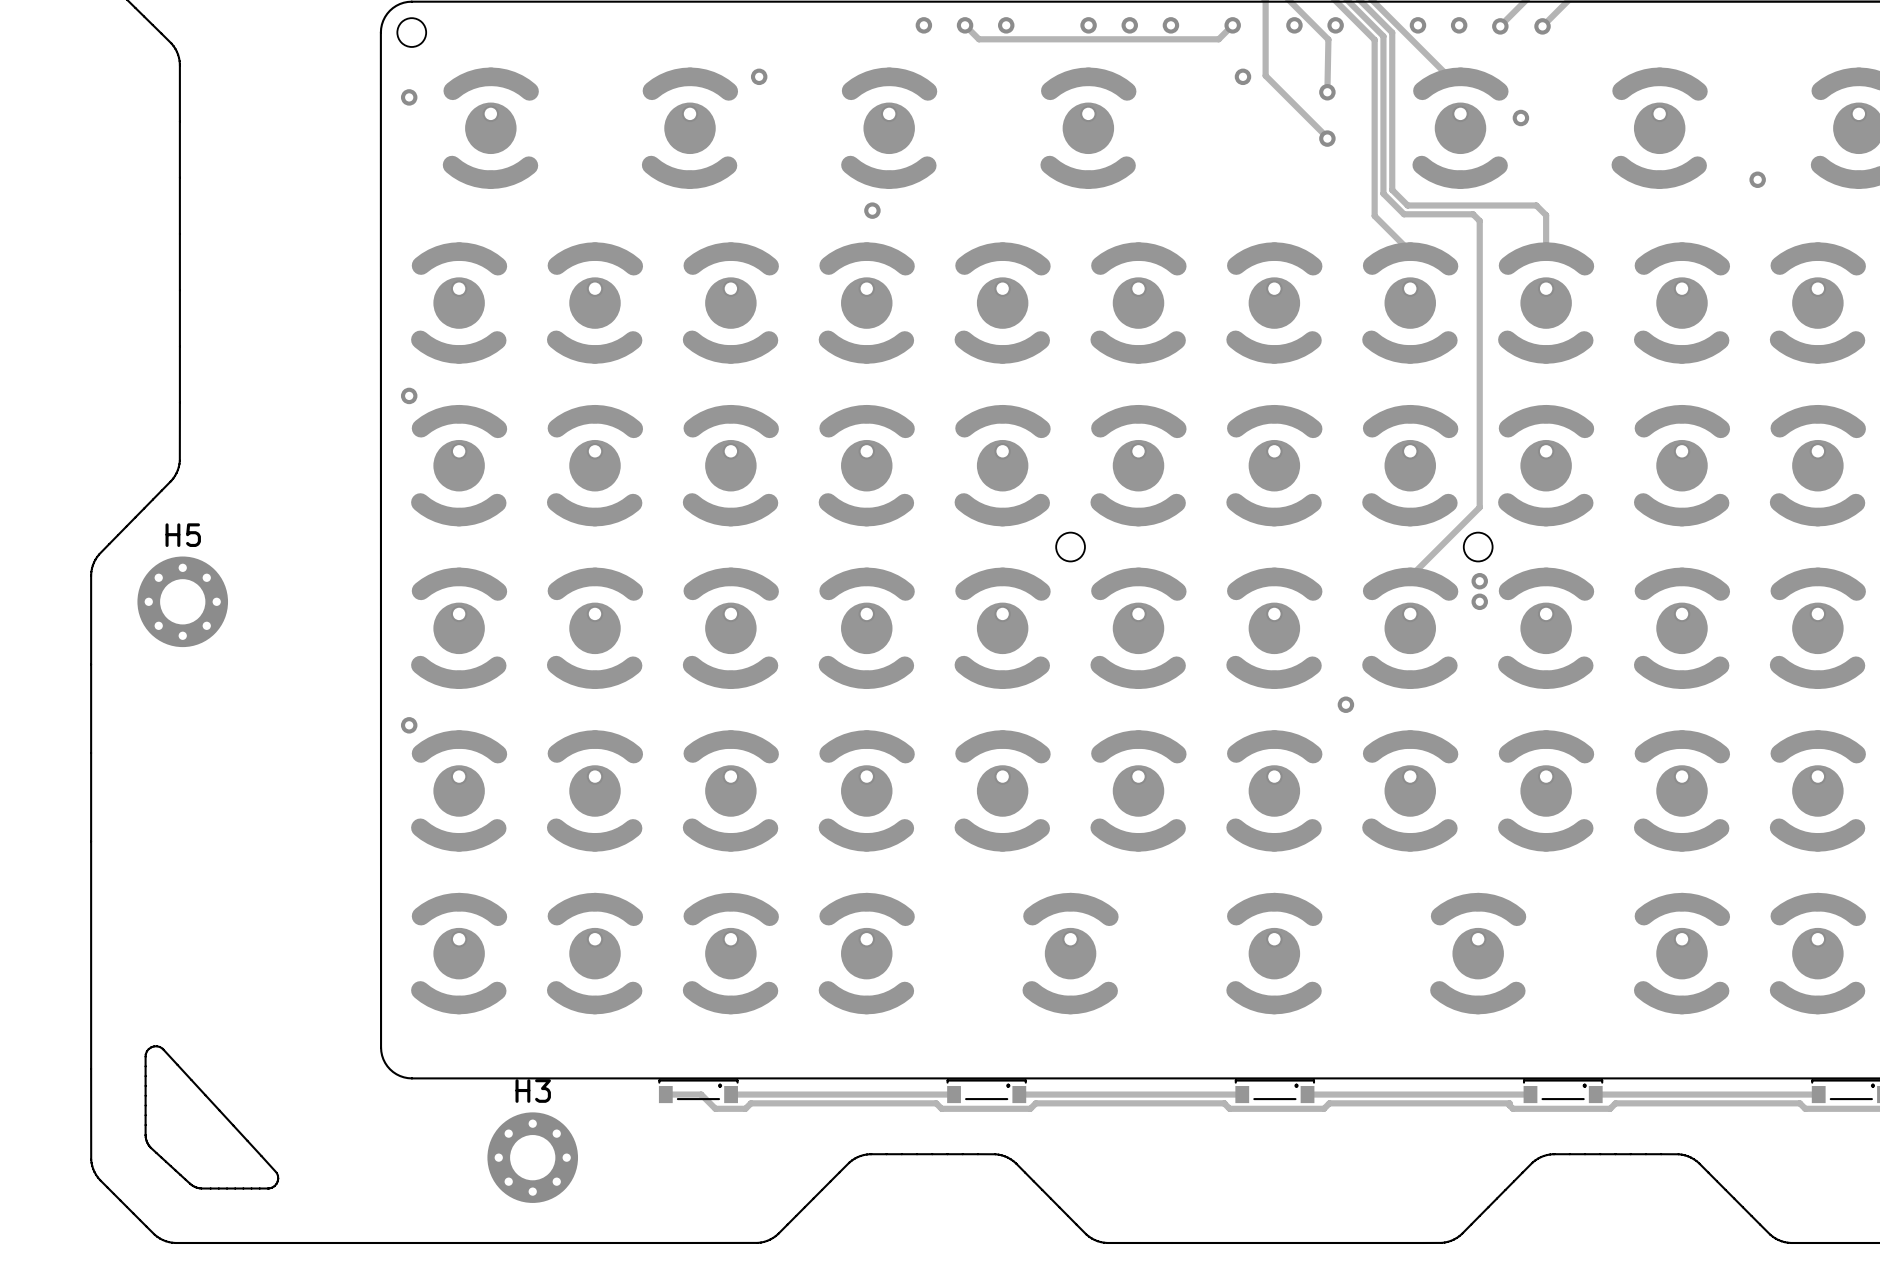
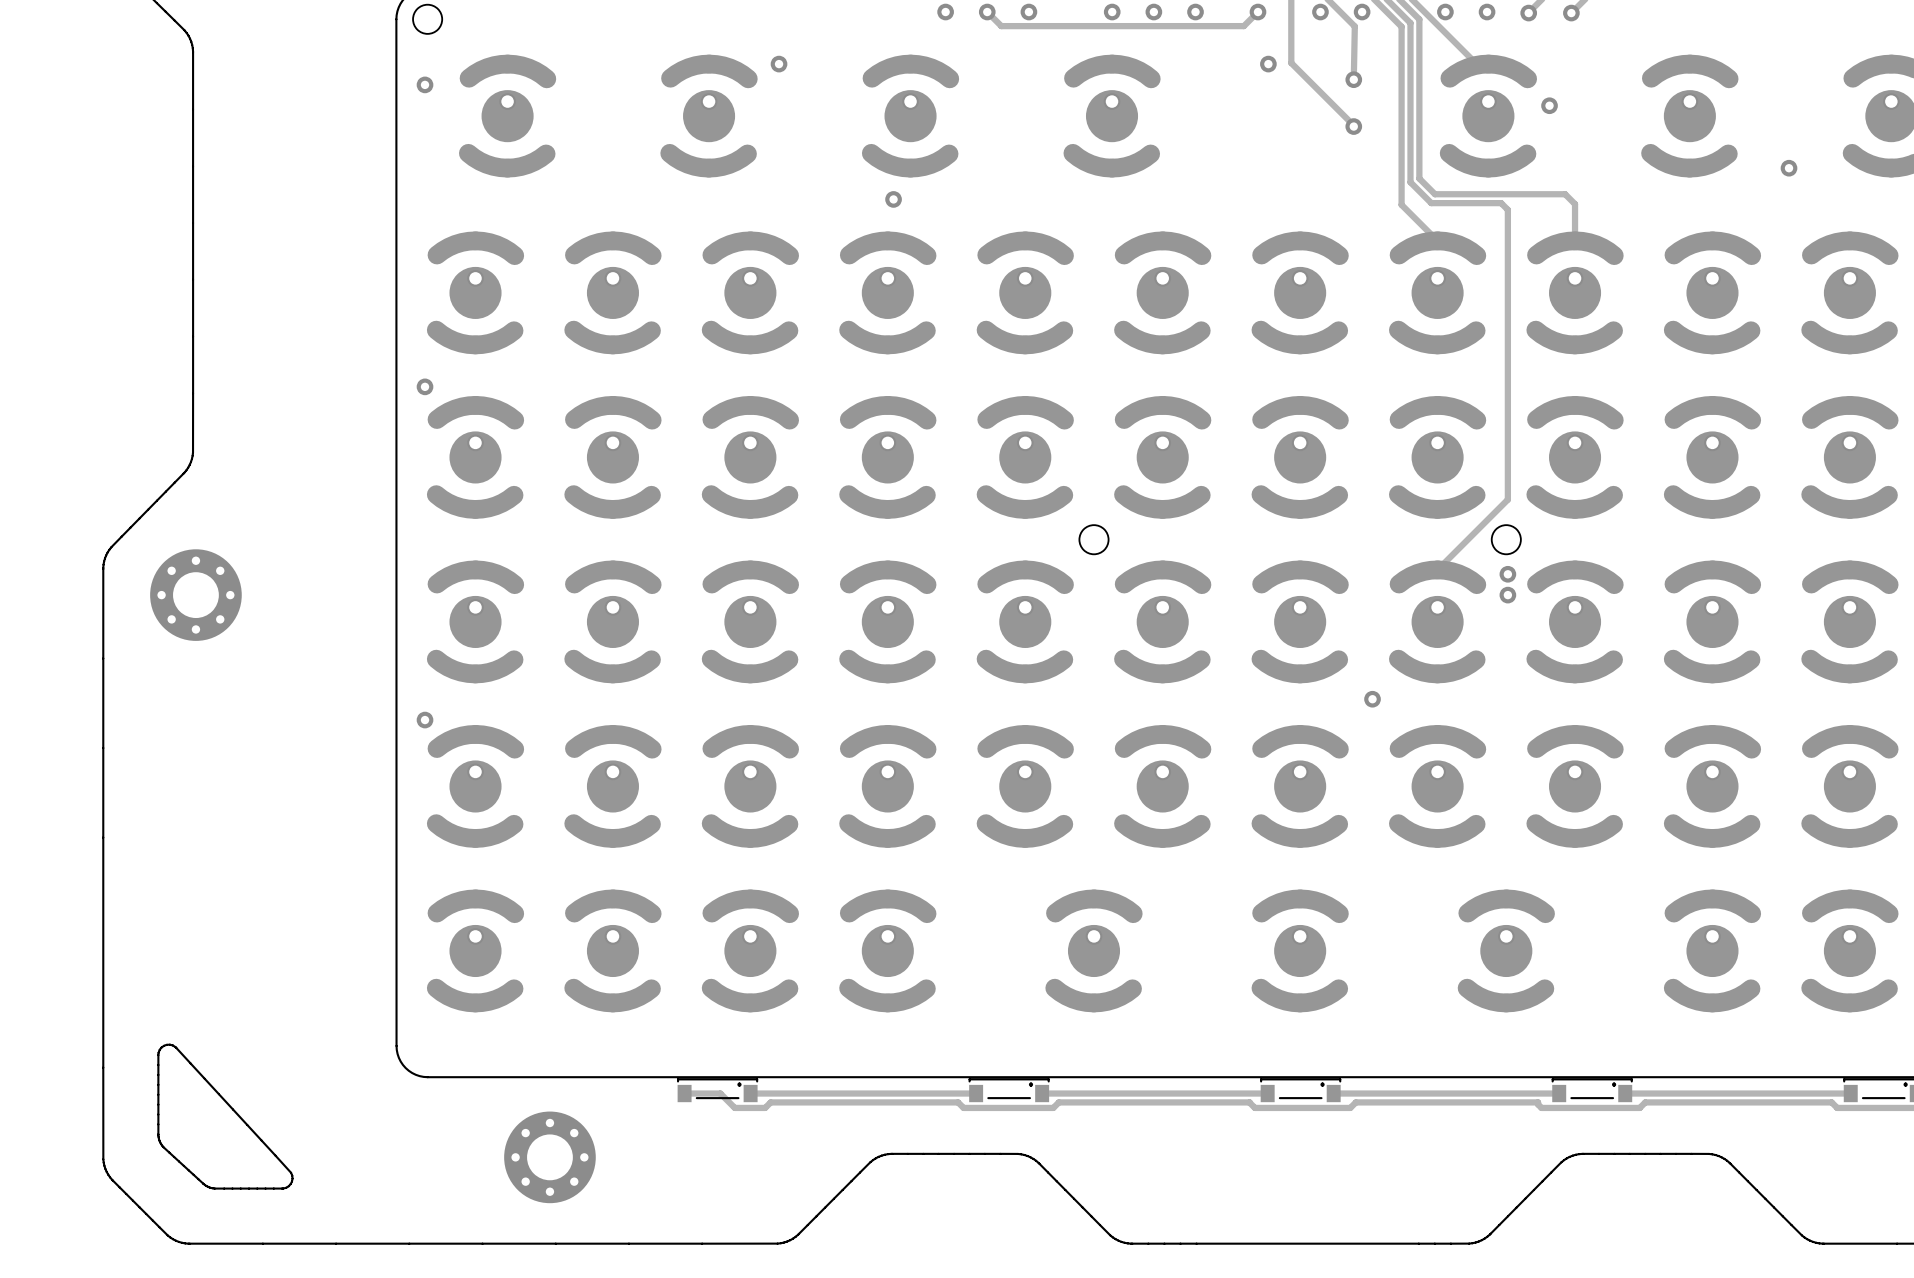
H5 name: H5 (183, 535) -> none
H3 name: H3 (533, 1091) -> none

